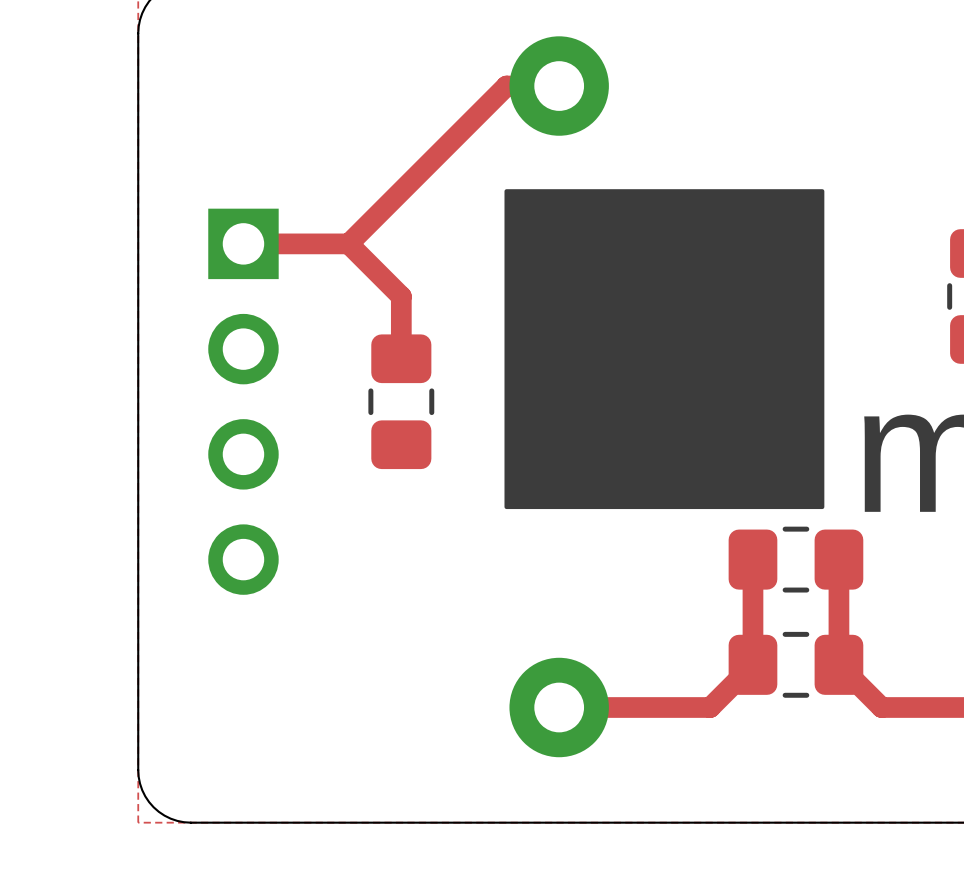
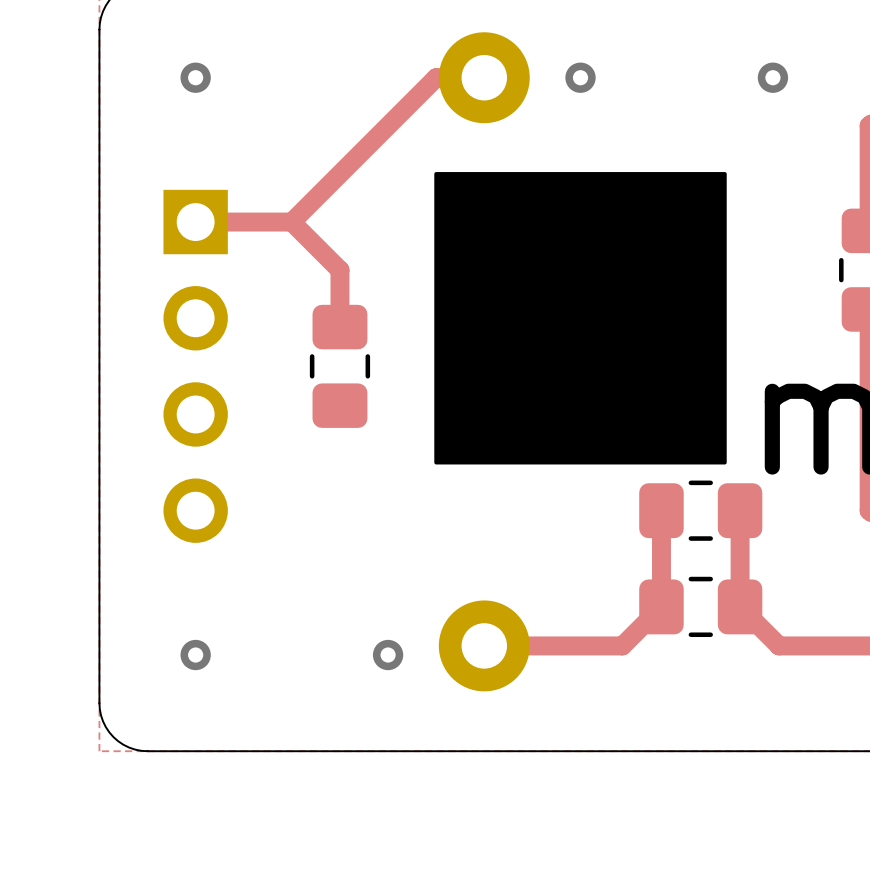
via: none -> (195, 77)
via: none -> (580, 77)
via: none -> (772, 77)
via: none -> (195, 655)
via: none -> (388, 655)

